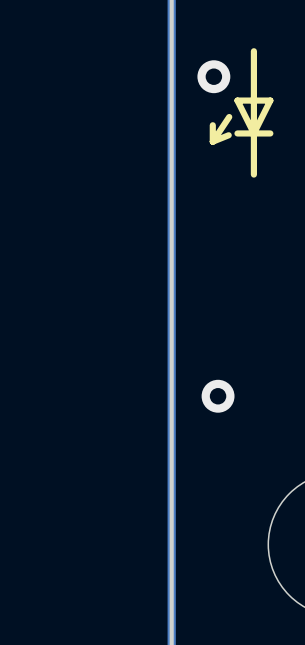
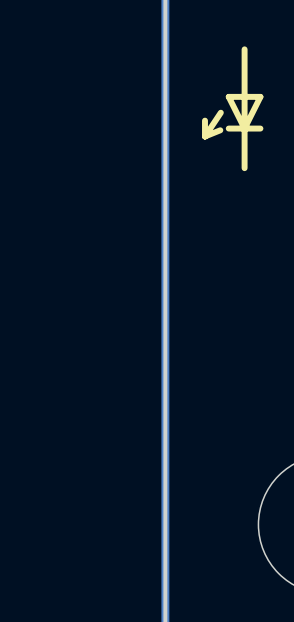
via: (213, 76) -> none
via: (218, 396) -> none

